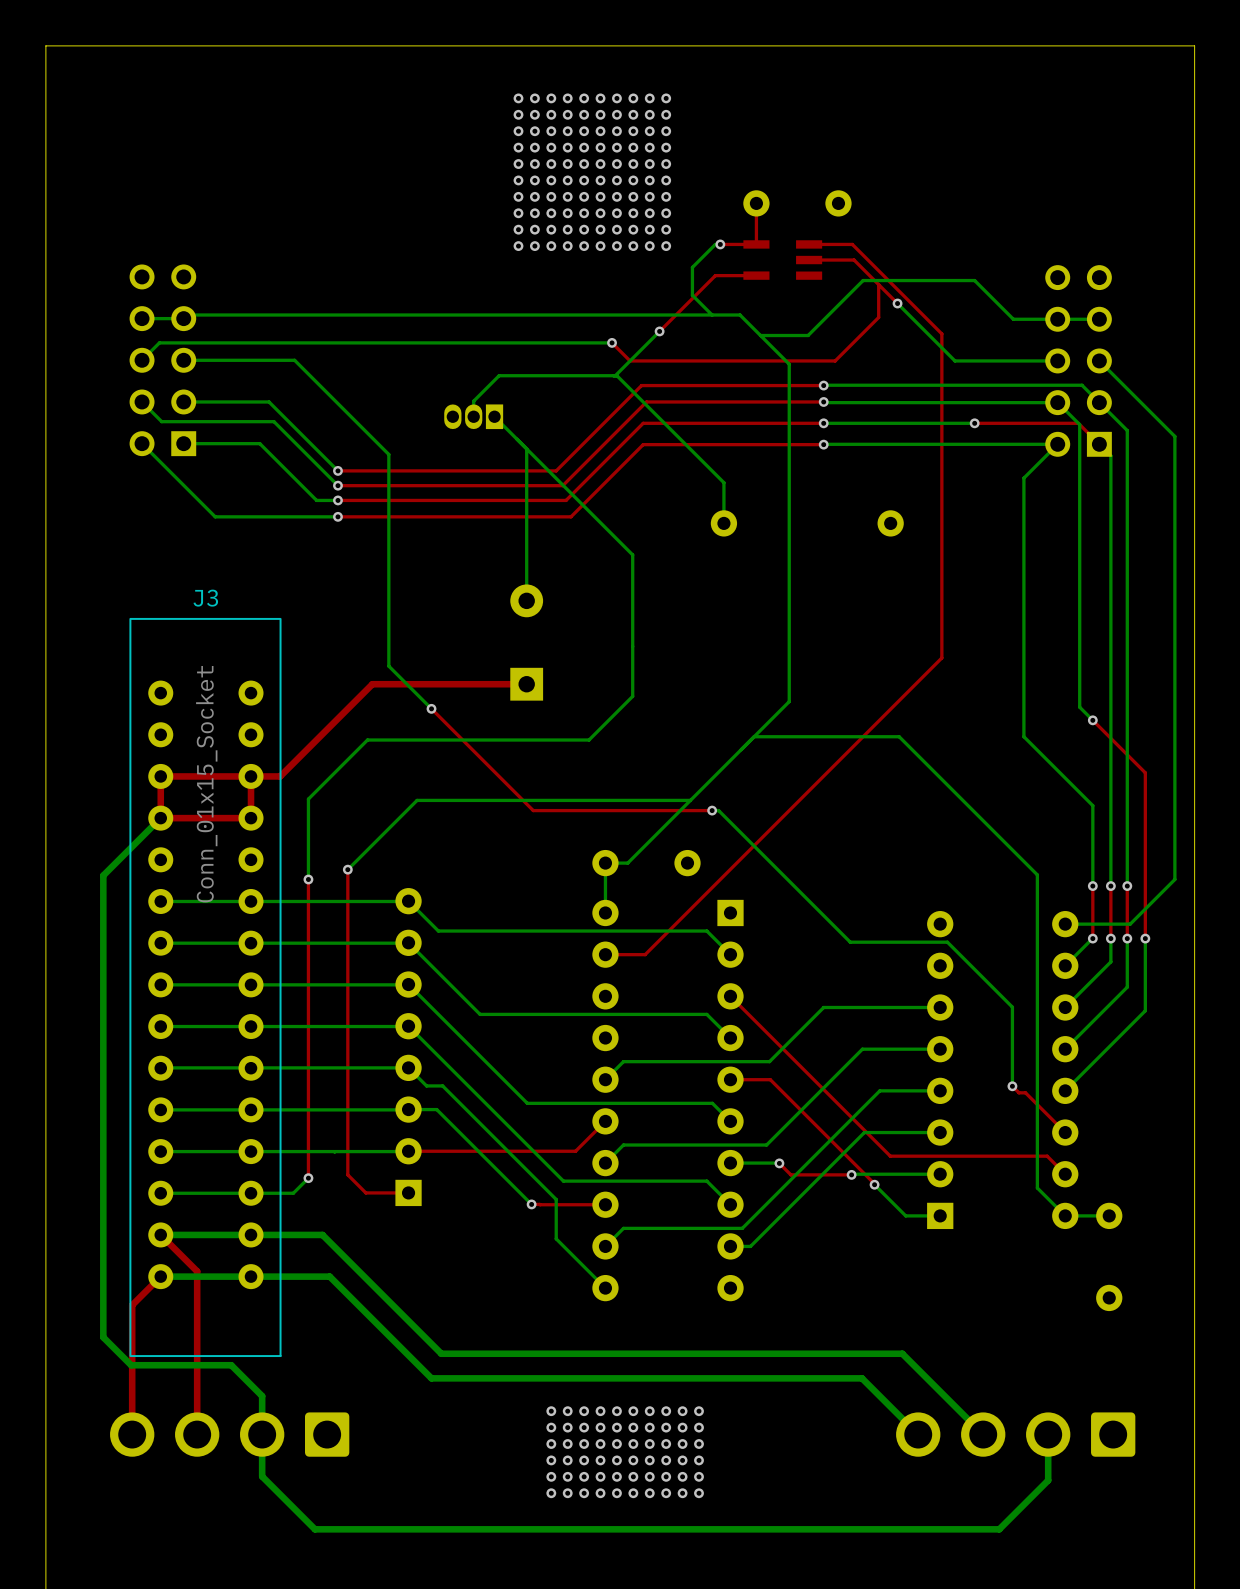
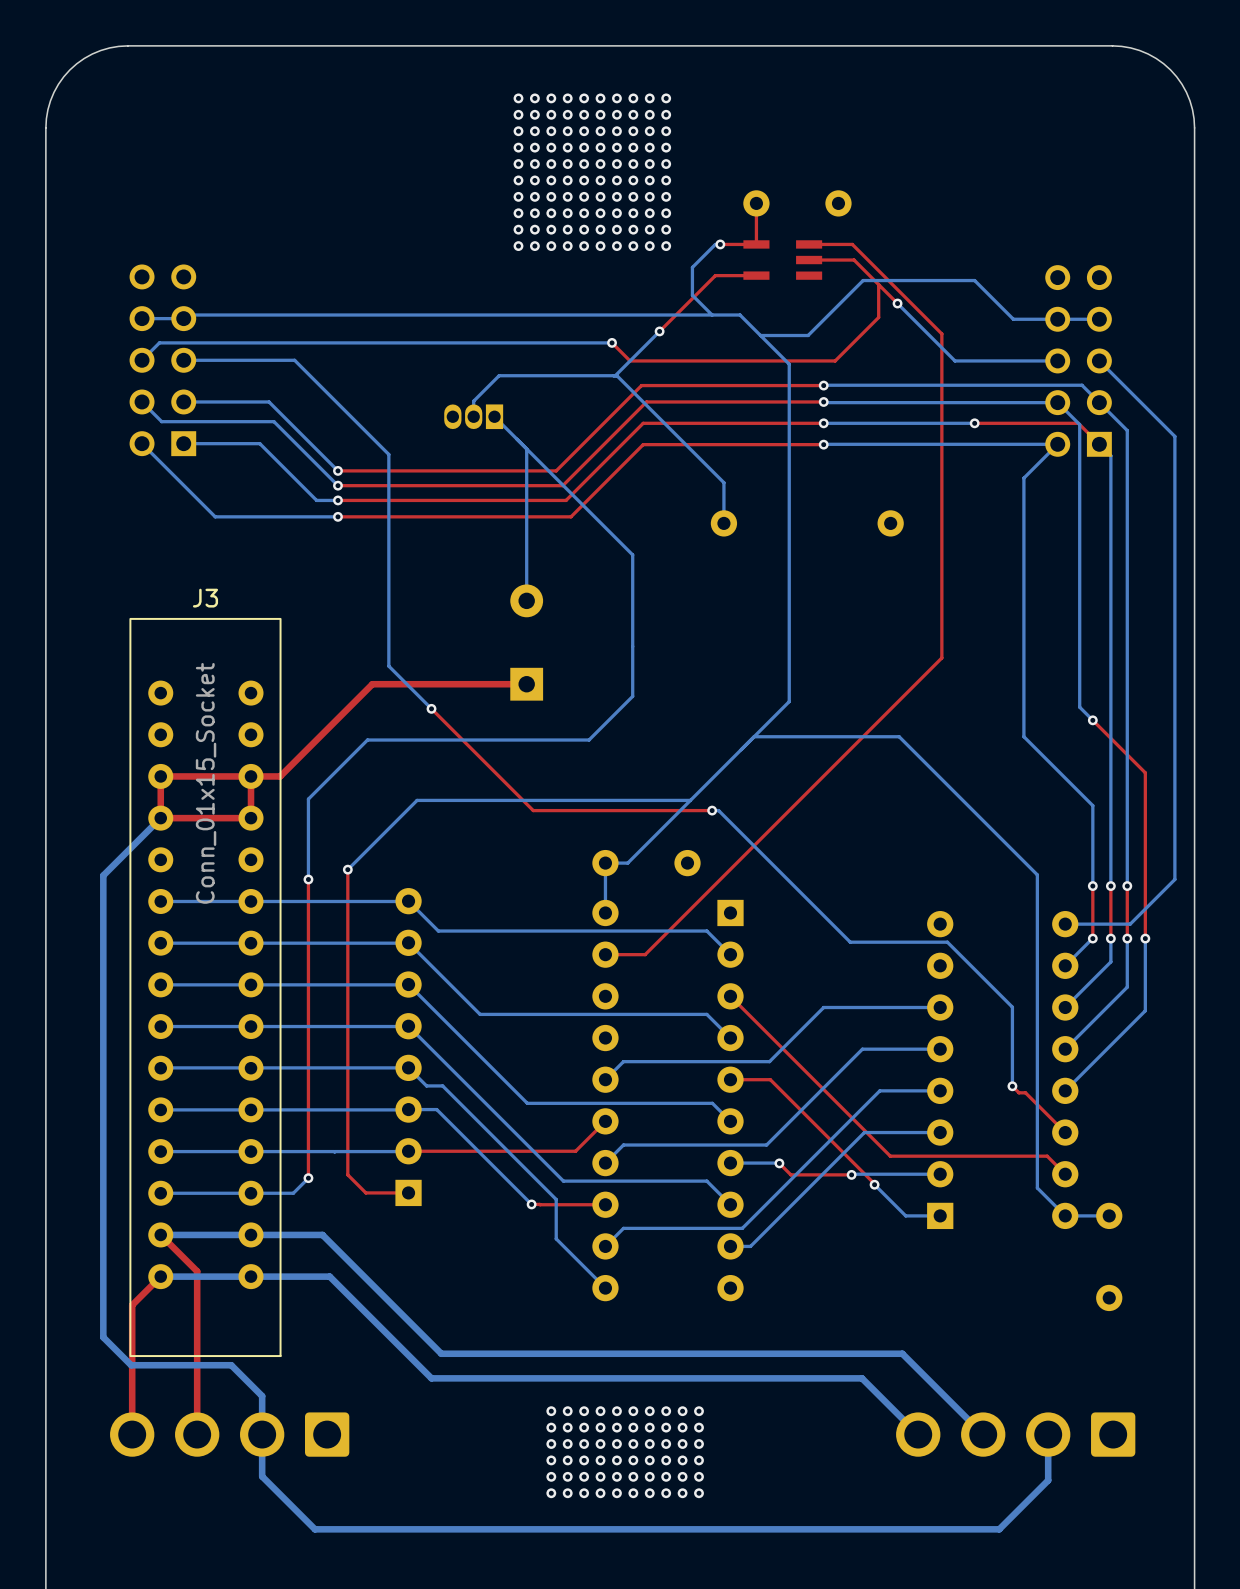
board edge: (127, 45) (45, 45) (45, 127) -> (127, 45) (100, 50) (84, 58) (69, 69) (54, 92) (47, 109) (45, 127)
board edge: (1112, 45) (1194, 45) (1194, 127) -> (1112, 45) (1130, 47) (1148, 54) (1170, 69) (1182, 84) (1189, 100) (1194, 127)

